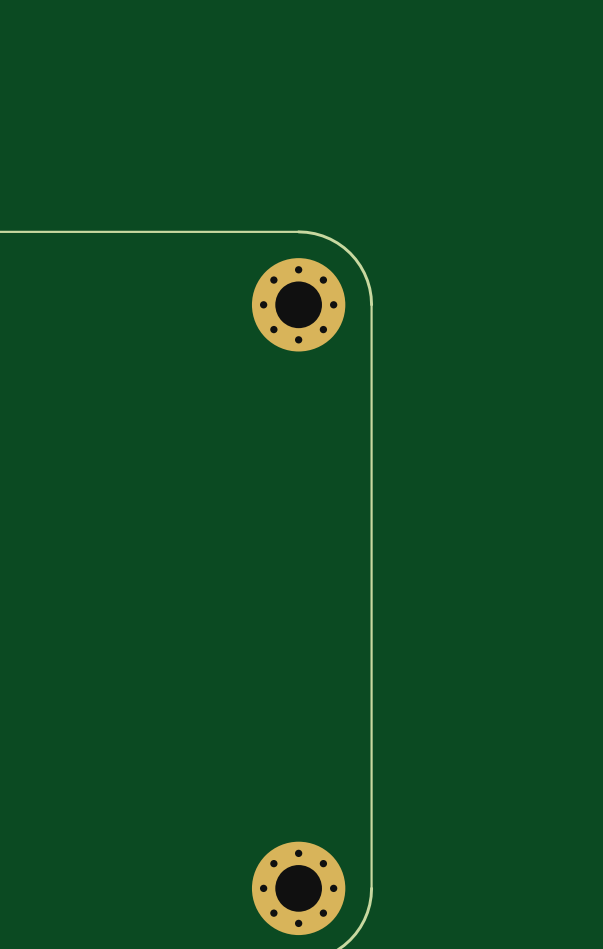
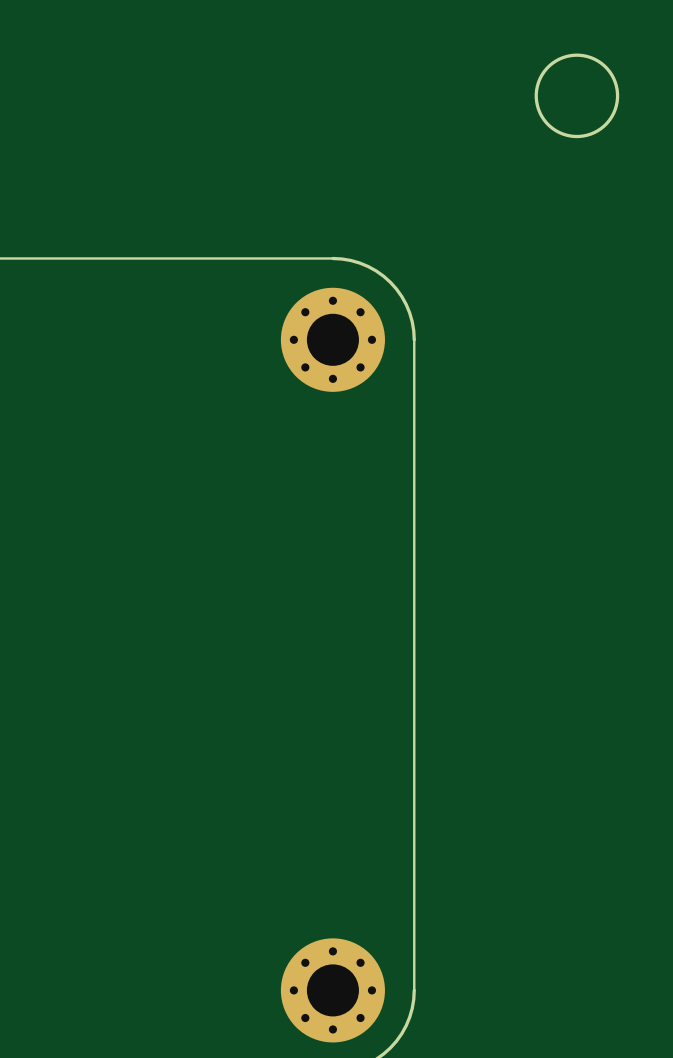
round board edge: none -> [534, 53, 620, 139]

